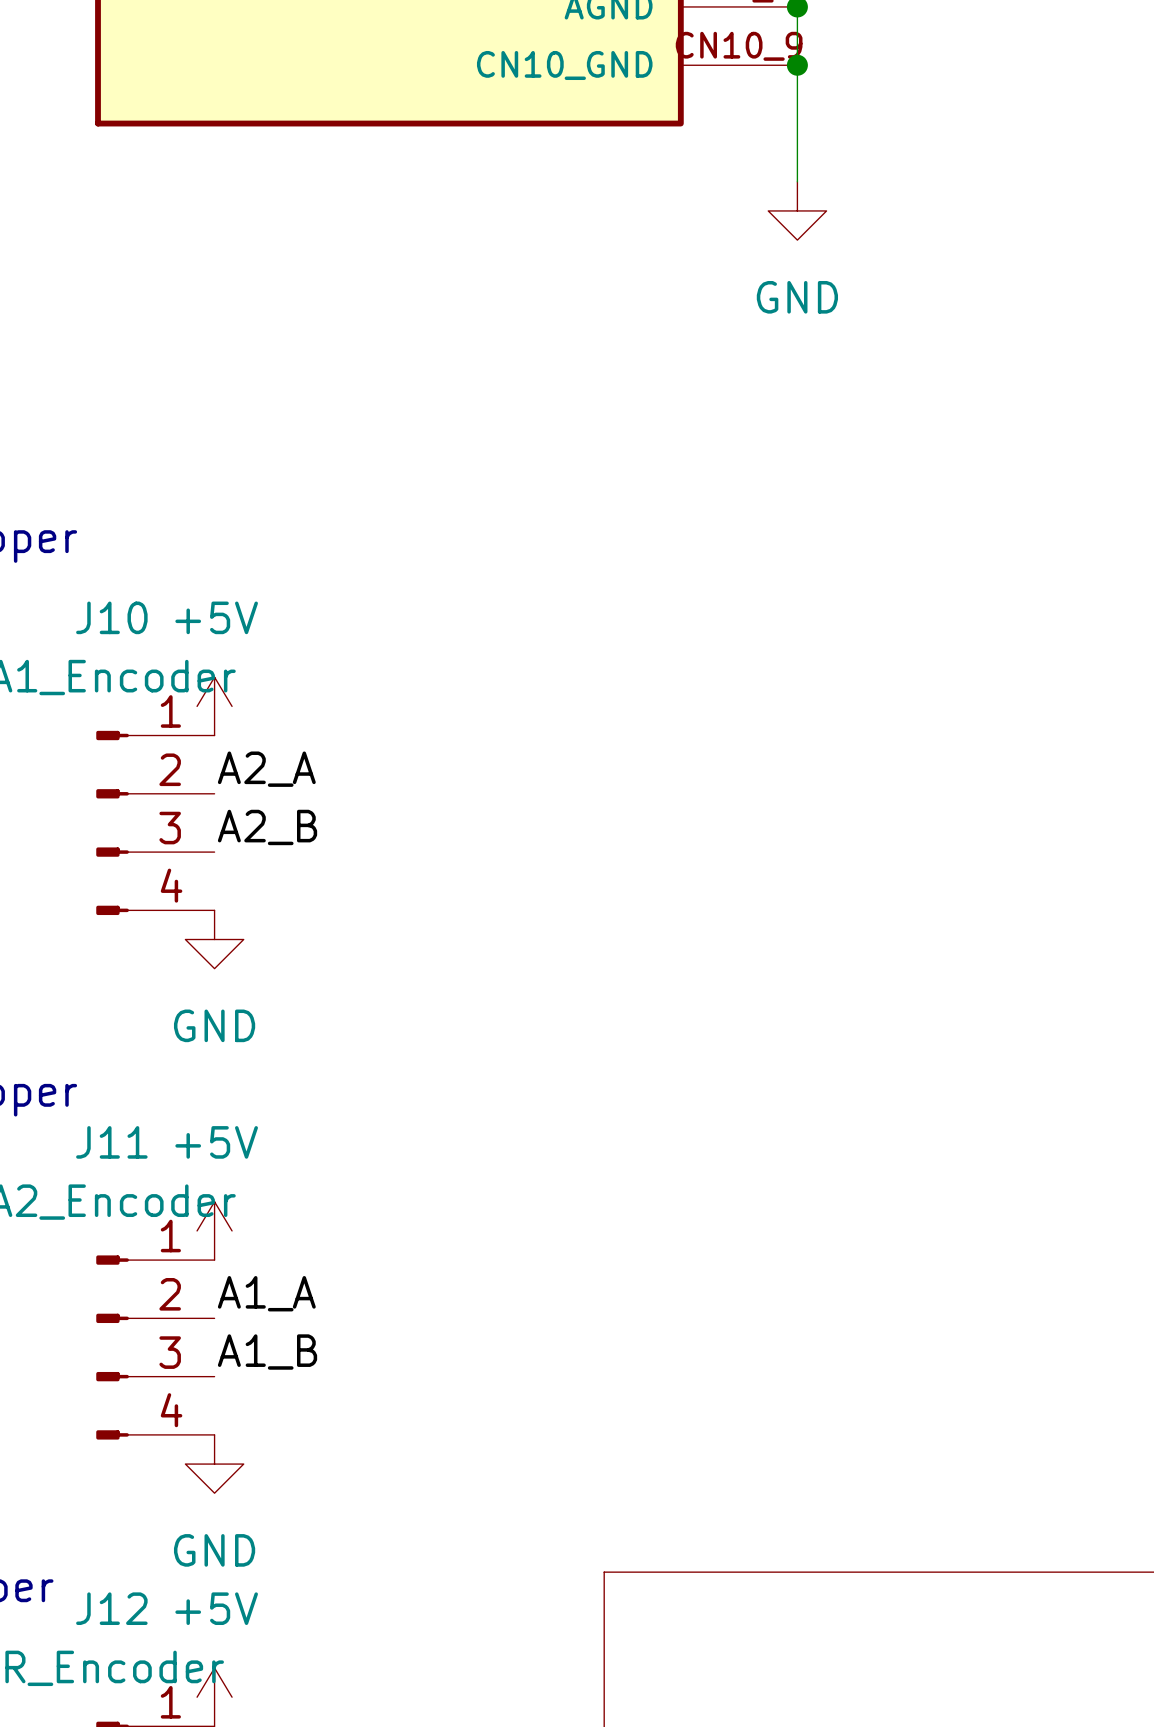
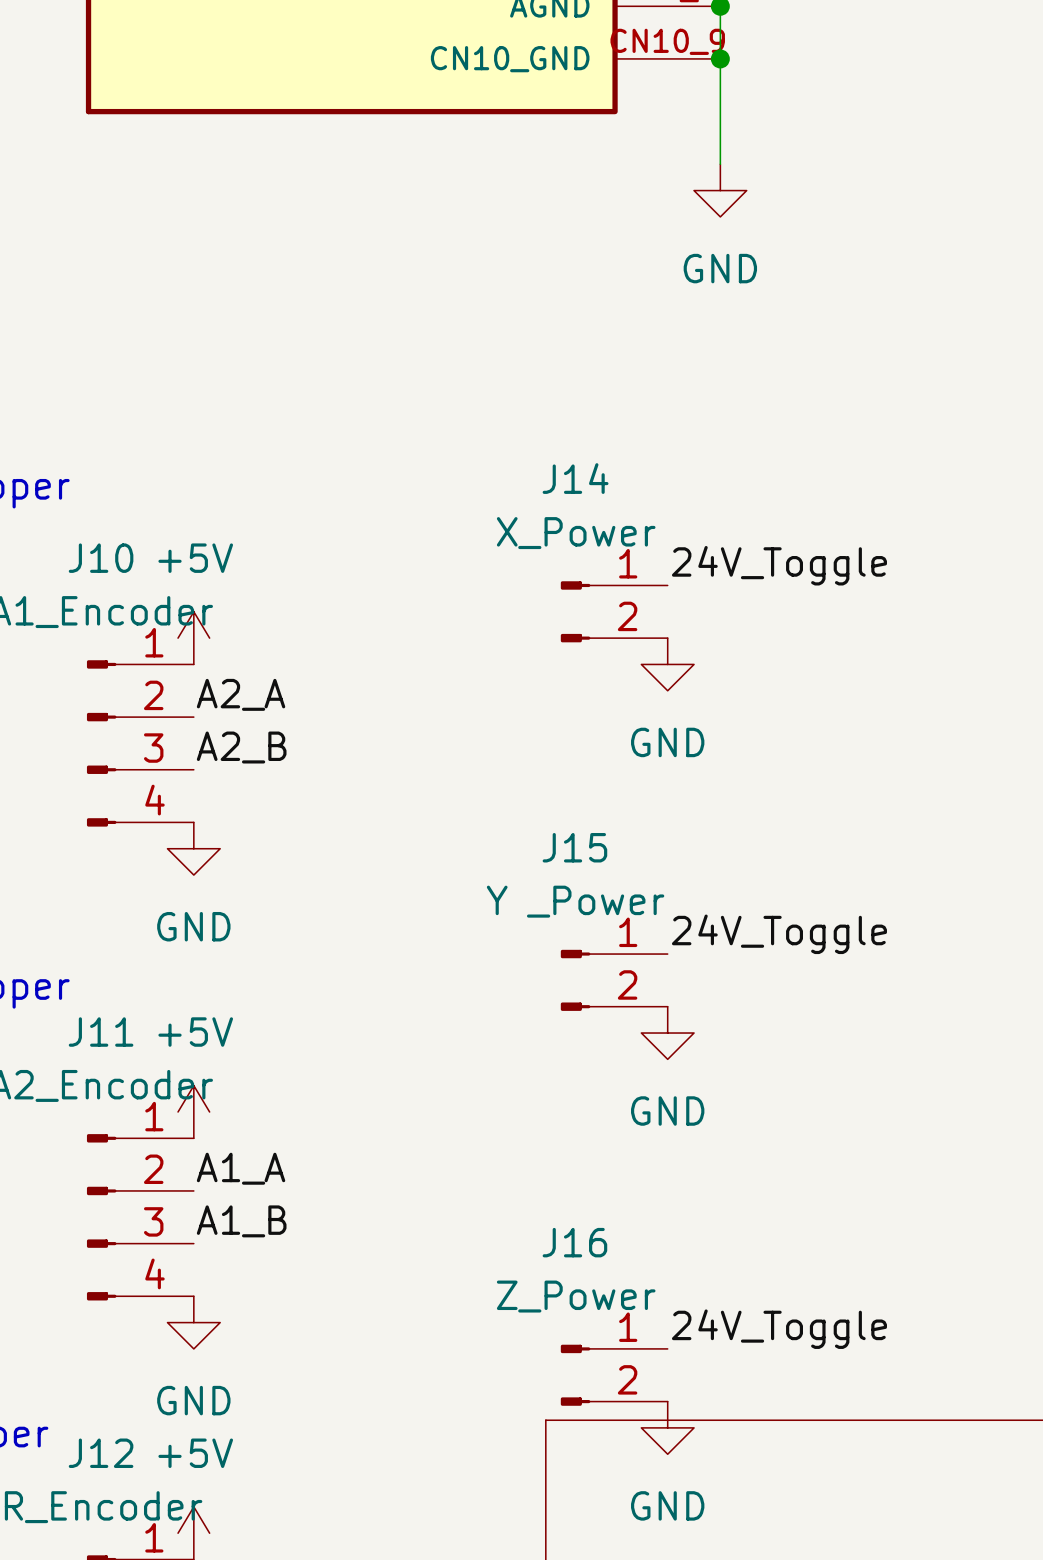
label: none -> 24V_Toggle (779, 565)
J14: none -> X_Power (614, 611)
power symbol: none -> GND (667, 664)
label: none -> 24V_Toggle (779, 934)
J15: none -> Y _Power (614, 980)
power symbol: none -> GND (667, 1033)
label: none -> 24V_Toggle (779, 1329)
J16: none -> Z_Power (614, 1375)
power symbol: none -> GND (667, 1427)

